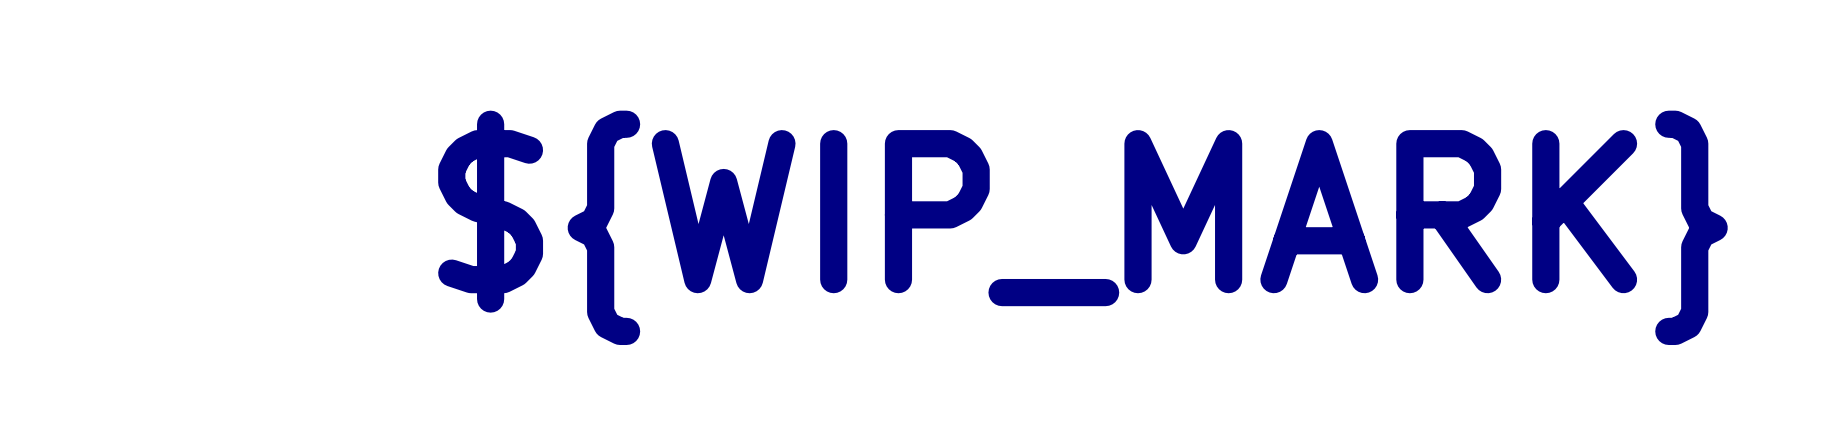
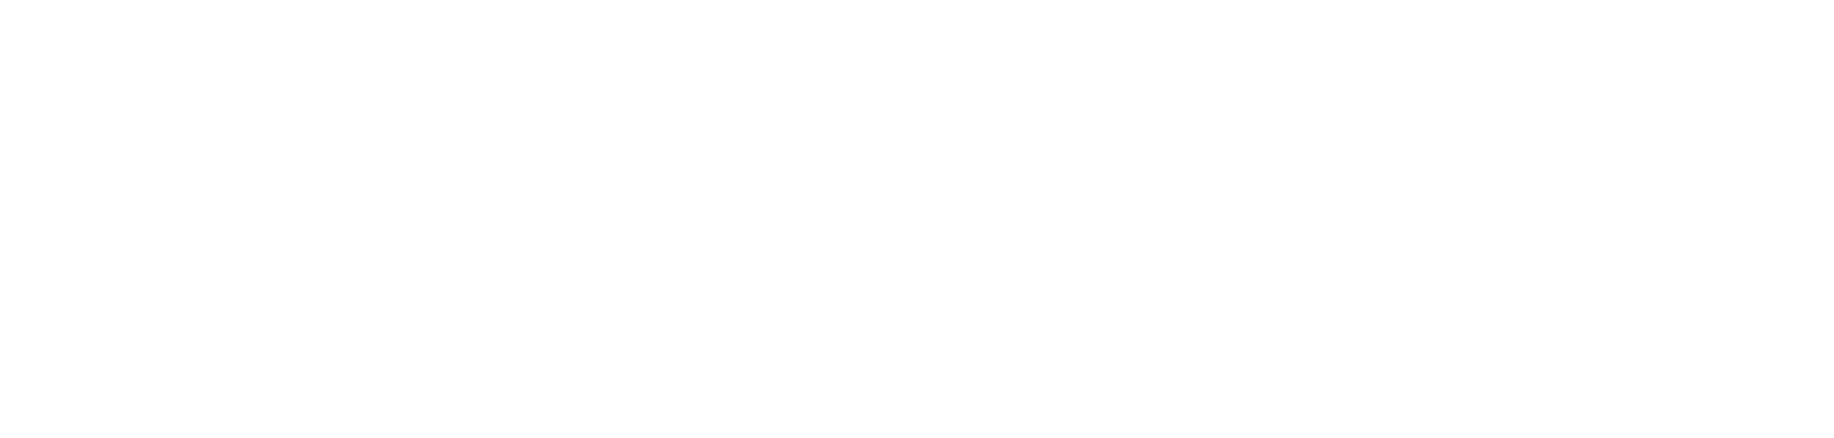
text: ${WIP_MARK} (1082, 227) -> none

